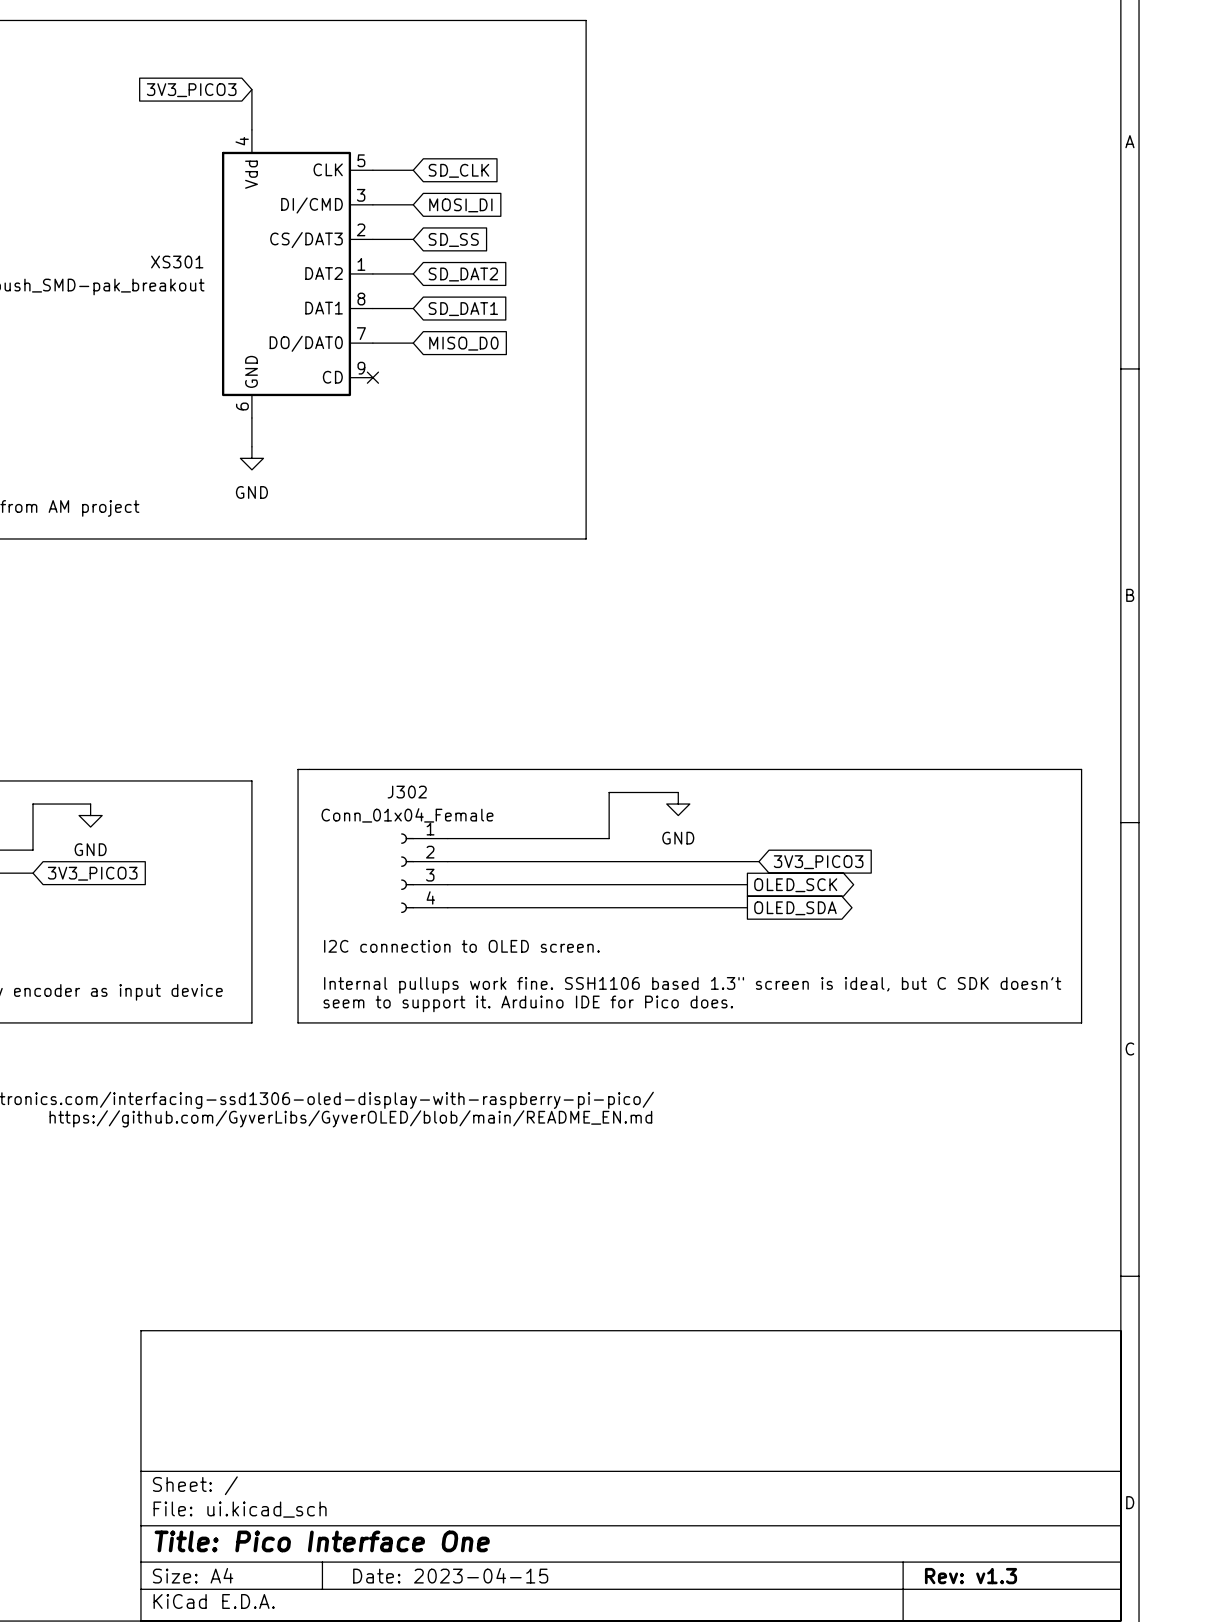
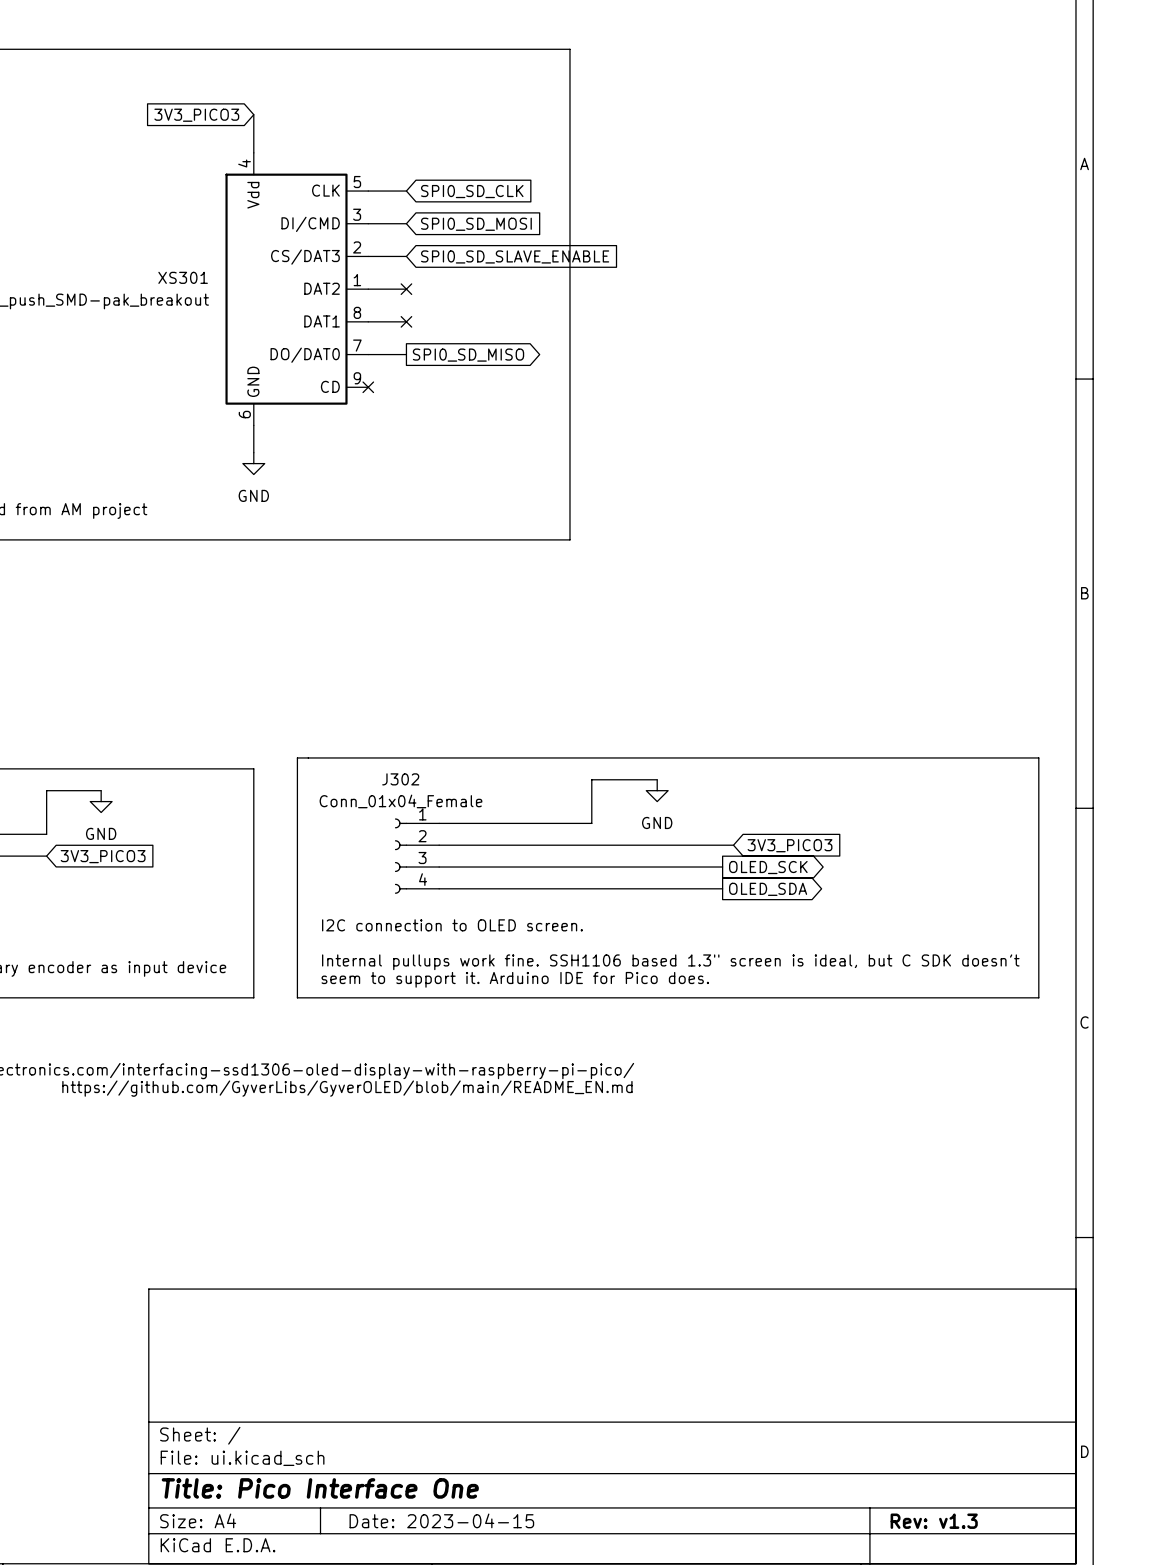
global label: SD_CLK (458, 170) -> SPI0_SD_CLK (472, 191)
global label: MOSI_DI (460, 205) -> SPI0_SD_MOSI (476, 224)
global label: SD_SS (453, 239) -> SPI0_SD_SLAVE_ENABLE (515, 256)
no-connect mark: none -> (406, 289)
global label: SD_DAT2 (463, 274) -> none
no-connect mark: none -> (406, 321)
global label: SD_DAT1 (463, 309) -> none
global label shape: input (463, 343) -> output (468, 355)
global label: MISO_D0 (463, 343) -> SPI0_SD_MISO (468, 355)

